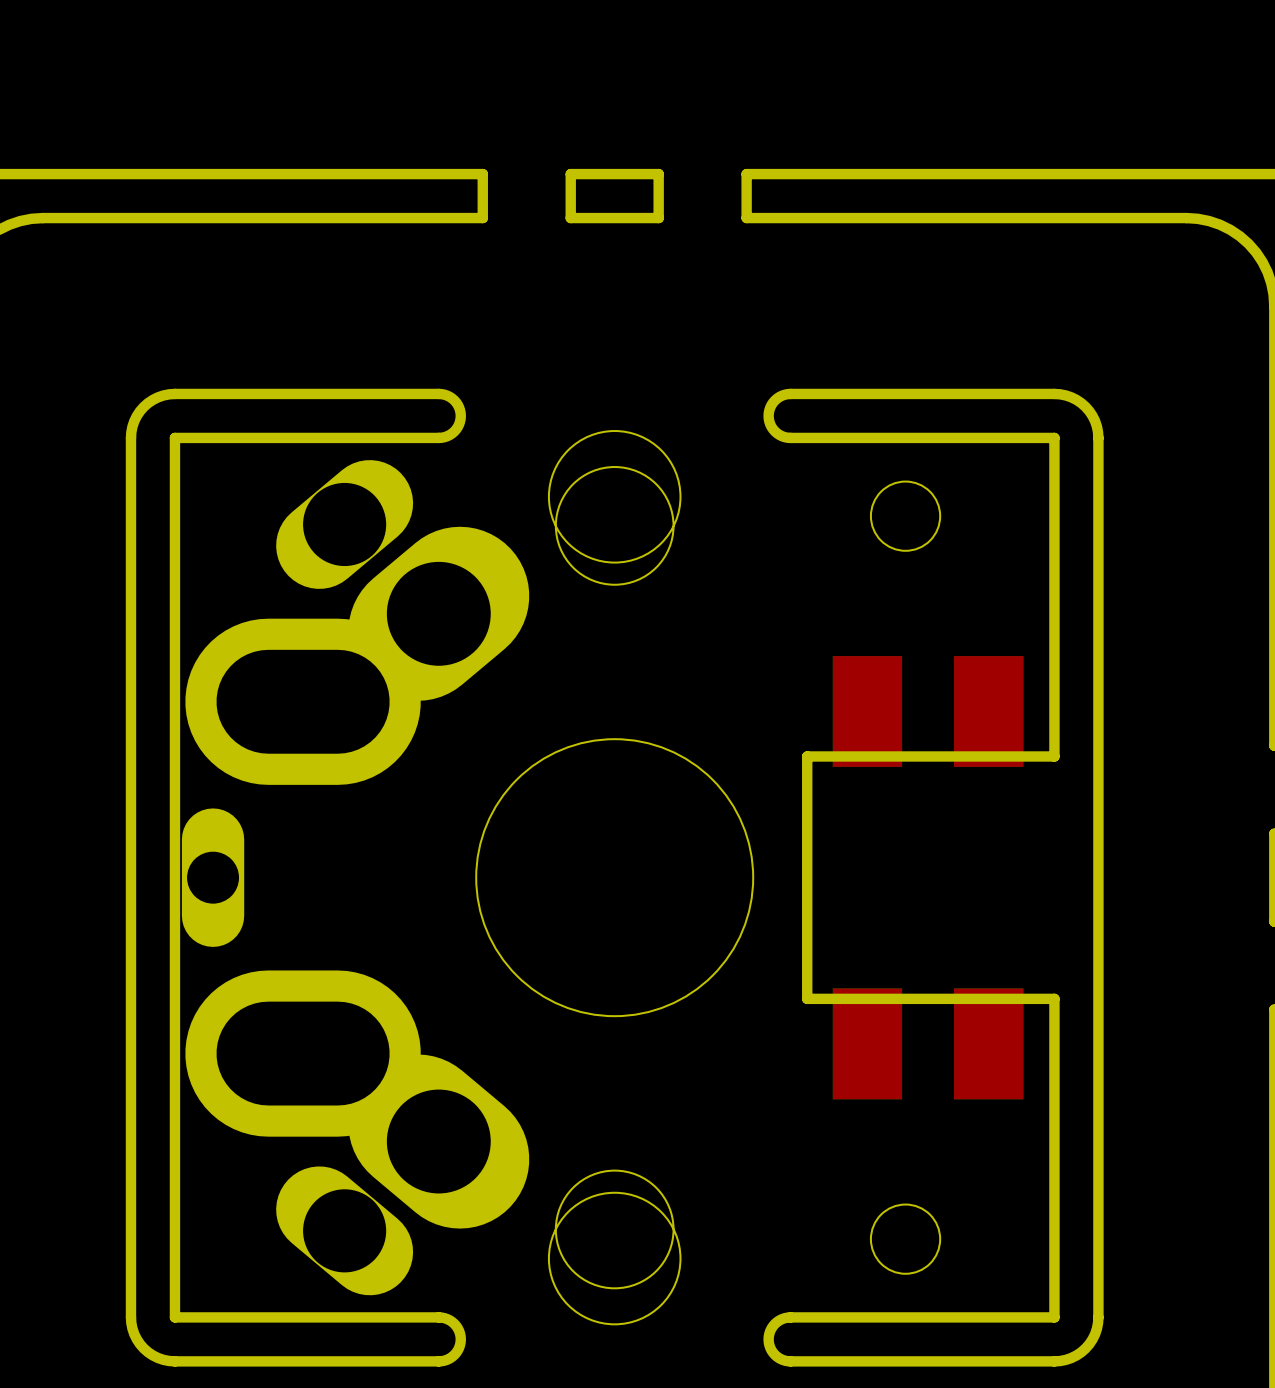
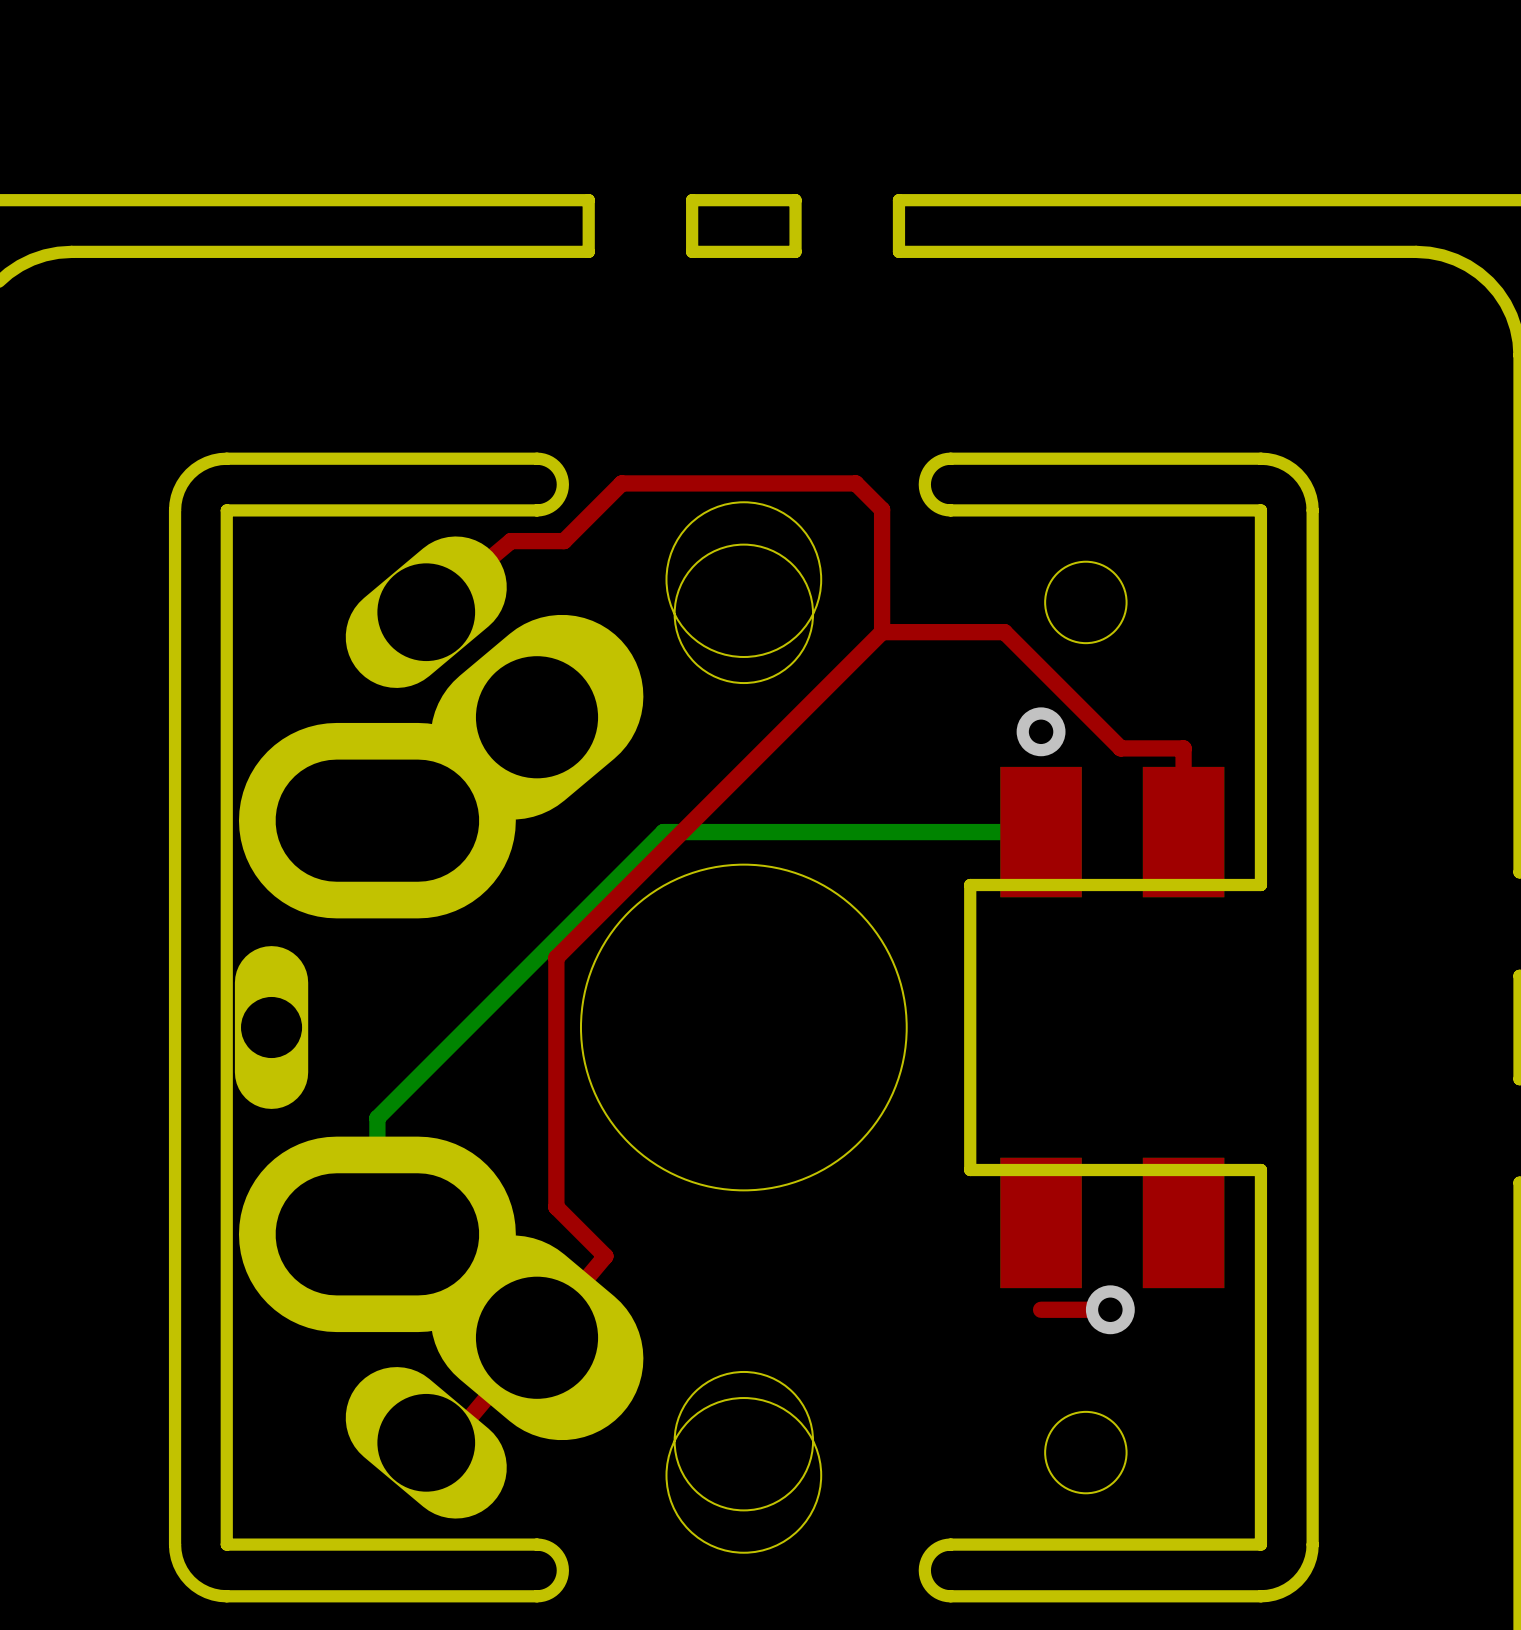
top track: none -> (426, 612) (510, 541) (564, 541) (621, 483) (855, 483) (882, 509) (882, 632)
top track: none -> (882, 632) (556, 957) (556, 1207) (605, 1256) (468, 1419) (426, 1419)
top track: none -> (882, 632) (1004, 632) (1120, 748) (1183, 748) (1183, 832)
via: none -> (1041, 731)
bottom track: none -> (1041, 832) (663, 832) (377, 1118) (377, 1234)
top track: none -> (1041, 1309) (1110, 1309)
via: none -> (1110, 1309)

